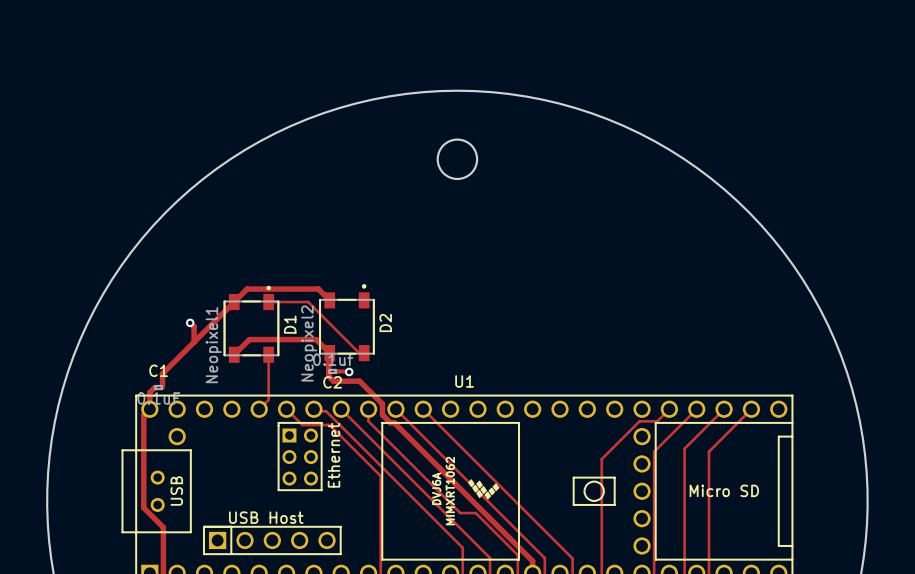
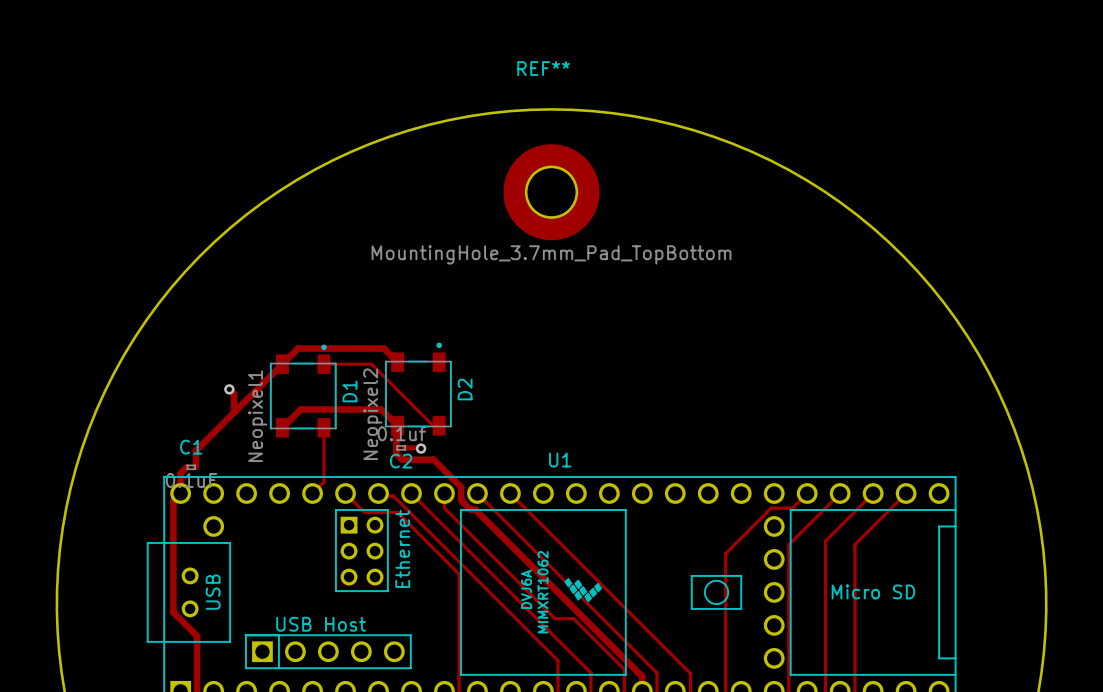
round board edge: [436, 138, 479, 181] -> none
REF**: none -> MountingHole_3.7mm_Pad_TopBottom (551, 192)

